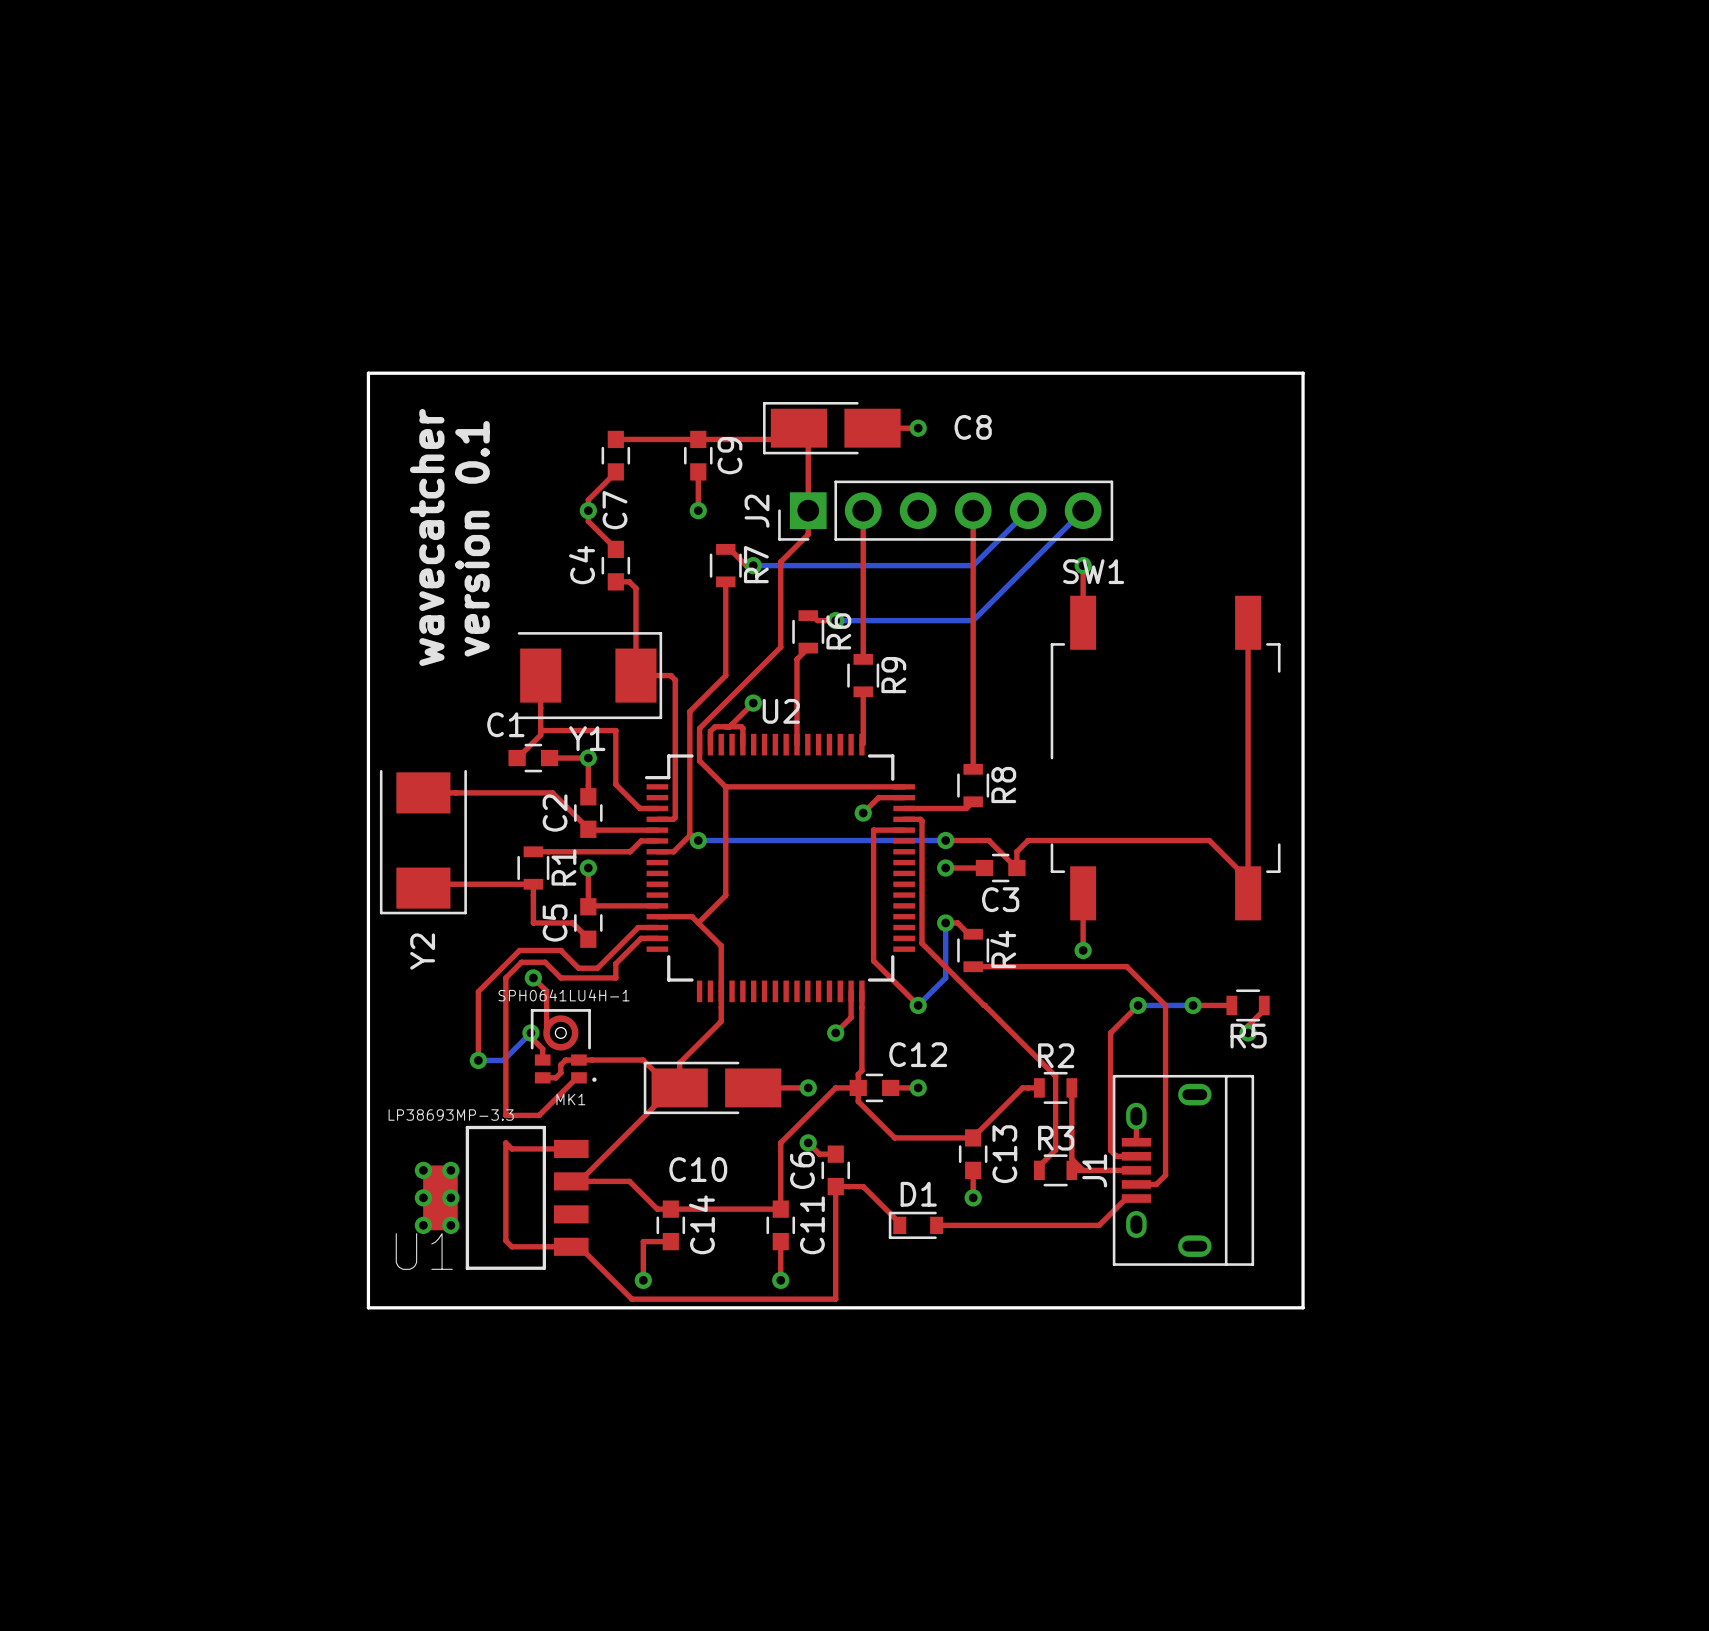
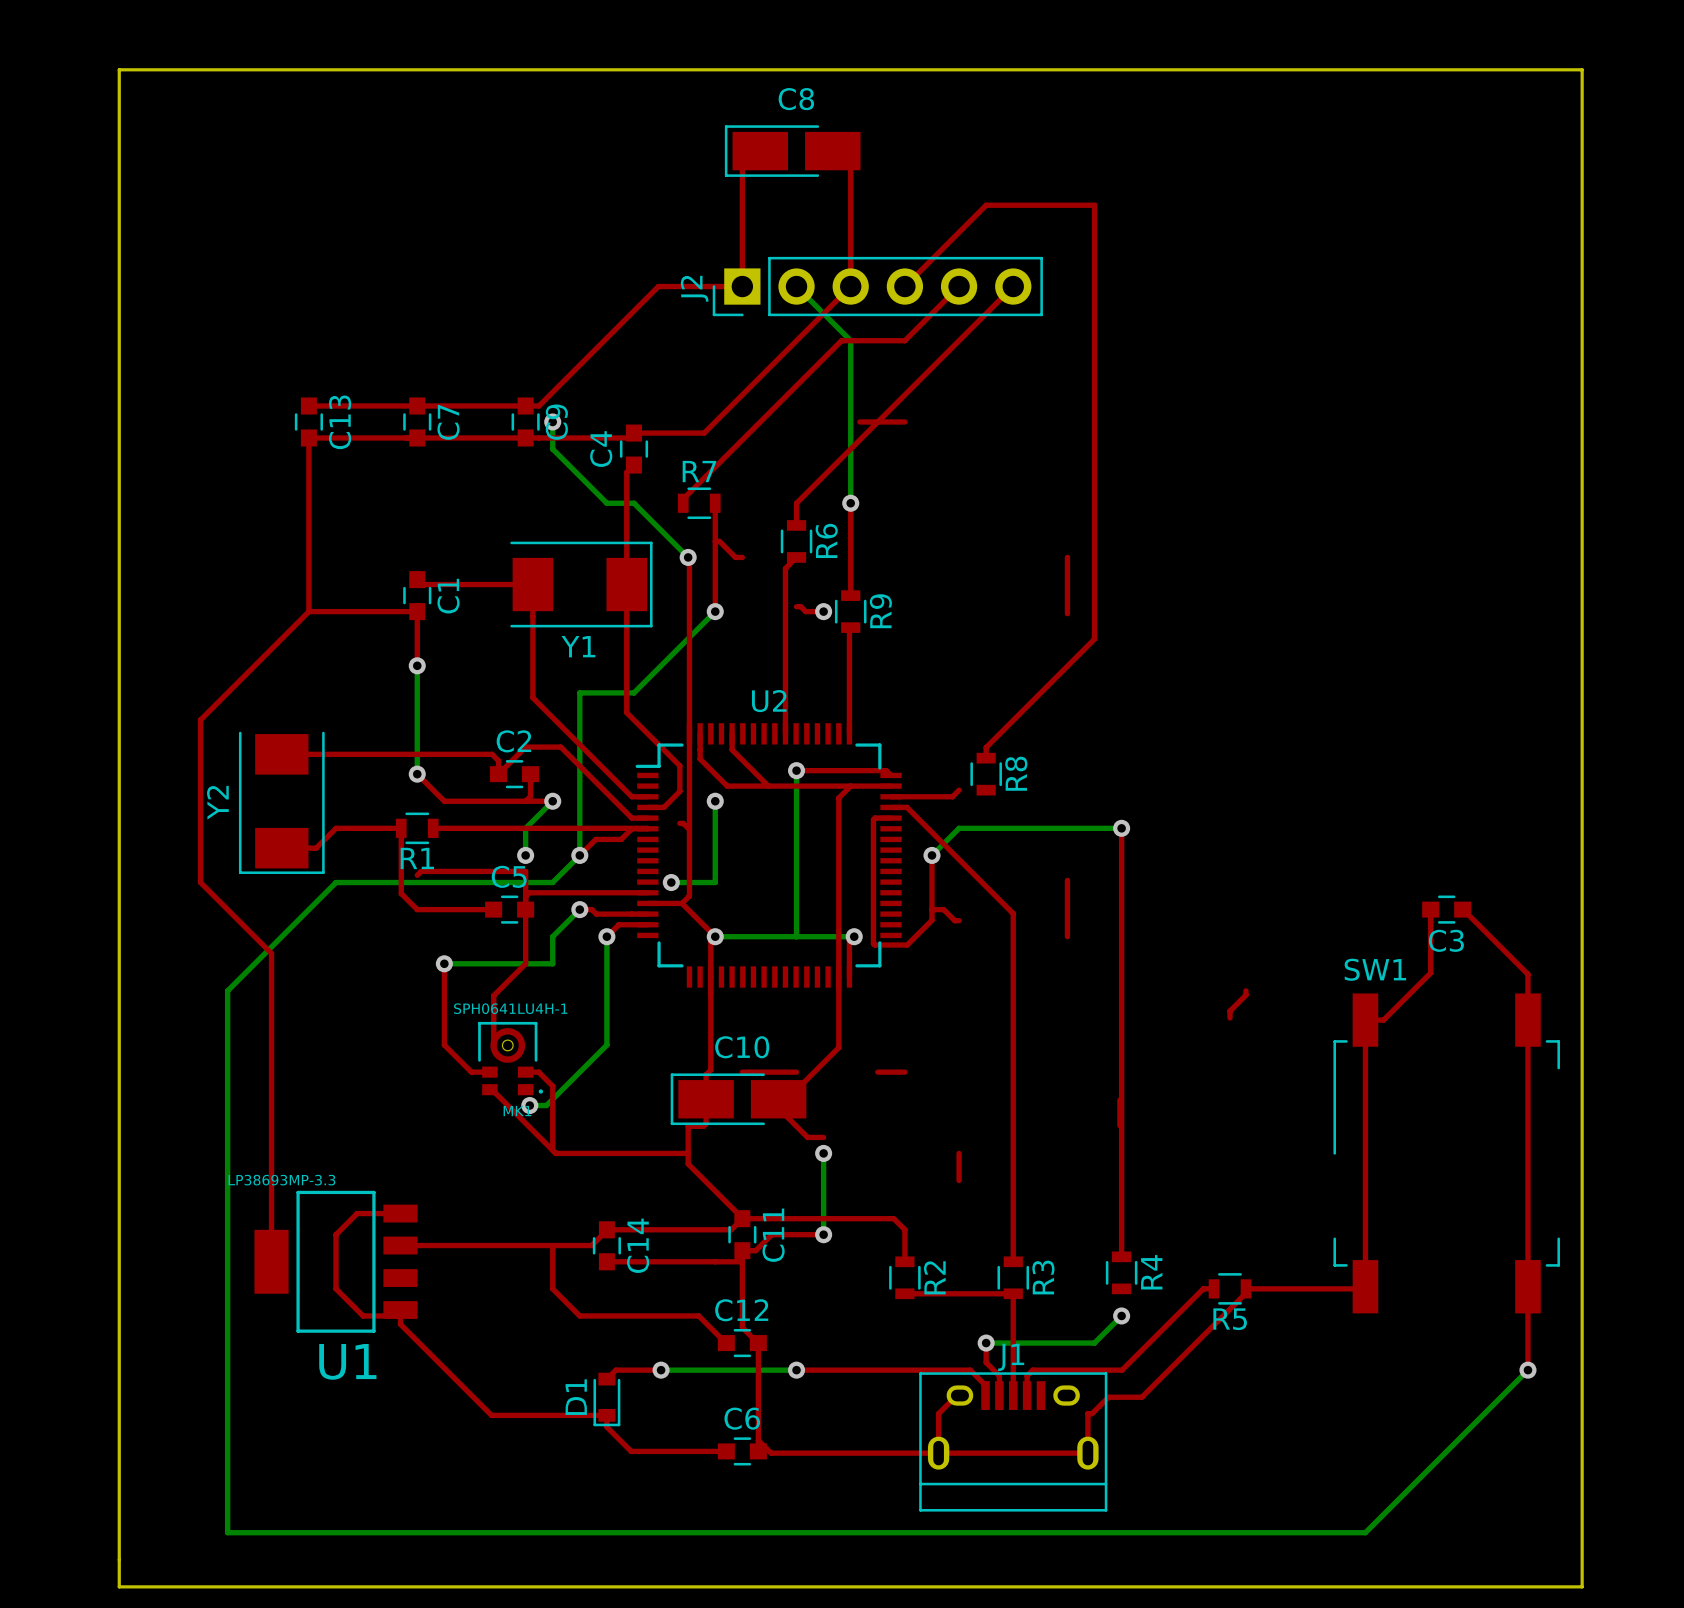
board edge: none -> (119, 69) (119, 1586) (1582, 1586) (1582, 69) (119, 69)
top track: none -> (760, 151) (742, 169) (742, 286) (658, 286) (538, 405) (308, 405)
top track: none -> (832, 151) (850, 169) (850, 286) (704, 433)
bottom track: none -> (796, 286) (850, 340) (850, 503)
top track: none -> (904, 286) (986, 205) (1094, 205) (1094, 639) (986, 747) (986, 758)
top track: none -> (959, 286) (904, 340) (841, 340) (683, 498) (683, 503)
board edge: (368, 373) (1303, 373) (1303, 1307) (368, 1307) (368, 373) -> none
C8 name position: C8 (973, 427) -> C8 (796, 99)
bottom track: none -> (552, 421) (552, 449) (606, 503) (633, 503) (688, 557)
via: none -> (552, 421)
C8 position: (831, 428) -> (792, 151)
via: (918, 428) -> none
top track: (615, 439) (643, 439) -> (308, 611) (308, 437) (629, 437) (633, 433)
top track: (714, 439) (787, 439) (798, 428) (808, 437) (808, 510) -> (1013, 286) (796, 503)
C7 position: (615, 455) -> (417, 421)
C9 position: (698, 455) -> (525, 421)
top track: (615, 471) (588, 499) (588, 521) (615, 549) -> none
top track: (698, 471) (698, 510) -> none
via: (588, 510) -> none
C7 name position: C7 (615, 510) -> C7 (448, 422)
via: (698, 510) -> none
top track: none -> (715, 503) (715, 573)
via: none -> (850, 503)
J2 position: (945, 510) -> (877, 286)
top track: (973, 510) (973, 769) -> none
bottom track: (1028, 510) (973, 565) (753, 565) -> none
bottom track: (1083, 510) (973, 620) (835, 620) -> none
top track: (808, 533) (780, 561) (780, 647) (699, 728) -> (688, 557) (689, 717)
text: wavecatcher (427, 537) -> none
text: version 0.1 (472, 538) -> none
R7 name position: R7 (756, 564) -> R7 (699, 471)
C4 position: (615, 565) -> (633, 449)
via: none -> (688, 557)
R7 rotation: 0° (725, 565) -> 90° clockwise (699, 503)
R7 position: (725, 565) -> (699, 503)
via: (753, 565) -> none
via: (1083, 565) -> none
top track: (615, 581) (629, 581) (635, 588) -> (633, 465) (626, 472) (626, 579)
top track: none -> (417, 579) (422, 584) (532, 584) (532, 665)
top track: (863, 604) (863, 659) -> none
top track: none -> (308, 611) (417, 611) (417, 665)
top track: none -> (308, 611) (200, 719) (200, 882) (271, 953) (271, 1261)
top track: (725, 620) (725, 675) (689, 711) (689, 777) -> none
bottom track: none -> (715, 611) (633, 692) (579, 692) (579, 855) (552, 882) (336, 882) (227, 990) (227, 1532) (1365, 1532) (1527, 1370)
via: none -> (715, 611)
top track: (1248, 622) (1248, 893) -> none
R6 position: (808, 631) -> (796, 541)
top track: (808, 648) (796, 659) -> (796, 557) (785, 568) (785, 649)
bottom track: none -> (417, 665) (417, 774)
via: none -> (417, 665)
Y1 position: (589, 675) -> (581, 584)
top track: (635, 675) (670, 675) (675, 680) (675, 817) -> (626, 665) (626, 712) (679, 765)
R9 position: (863, 675) -> (850, 611)
top track: (863, 691) (861, 744) -> (850, 627) (849, 733)
top track: (753, 703) (729, 726) -> none
via: (753, 703) -> none
top track: (540, 708) (540, 735) (517, 758) -> none
top track: (540, 730) (615, 730) (615, 784) (641, 808) -> (532, 697) (631, 796)
top track: (710, 744) (710, 731) (714, 726) (741, 726) (742, 744) -> (768, 786) (732, 749) (732, 733)
C1 rotation: 0° (533, 758) -> 90° clockwise (417, 595)
C1 position: (533, 758) -> (417, 595)
top track: none -> (541, 747) (525, 747) (498, 774) (498, 760) (492, 754) (281, 754)
top track: (569, 758) (588, 758) (588, 796) -> (560, 747) (631, 818)
via: (588, 758) -> none
SW1 position: (1165, 758) -> (1446, 1153)
top track: (699, 760) (725, 786) (904, 786) -> (796, 770) (886, 770) (891, 775)
top track: none -> (689, 749) (689, 895) (681, 903)
bottom track: none -> (796, 770) (796, 936)
via: none -> (796, 770)
top track: none -> (417, 774) (444, 801) (552, 801)
via: none -> (417, 774)
R8 position: (973, 785) -> (986, 774)
top track: (725, 786) (725, 895) (698, 922) -> none
top track: none -> (525, 779) (530, 774) (530, 796) (525, 801)
top track: (423, 792) (552, 792) (589, 830) (641, 830) -> none
top track: none -> (850, 786) (838, 798) (838, 977)
top track: (878, 797) (863, 813) -> (865, 786) (727, 786) (700, 759) (700, 733)
top track: (689, 803) (689, 835) (673, 851) (657, 851) -> (679, 791) (665, 805)
bottom track: none -> (552, 801) (525, 828) (525, 855)
via: none -> (552, 801)
C2 rotation: 0° (588, 813) -> 90° clockwise (514, 774)
C2 position: (588, 813) -> (514, 774)
bottom track: none -> (715, 801) (715, 882) (671, 882)
via: none -> (715, 801)
via: (863, 813) -> none
top track: (921, 820) (921, 943) (1055, 1076) (1055, 1149) (1039, 1166) (1039, 1170) -> (908, 809) (1013, 913) (1013, 1261)
top track: (887, 830) (873, 830) (873, 960) (918, 1005) -> none
top track: none -> (433, 828) (647, 828)
bottom track: (698, 840) (945, 840) -> none
via: (698, 840) -> none
top track: (945, 840) (988, 840) (1016, 868) (1016, 851) (1028, 840) (1209, 840) (1248, 879) -> none
via: (945, 840) -> none
top track: none -> (1121, 828) (1121, 1256)
bottom track: none -> (1121, 828) (959, 828) (931, 855)
via: none -> (1121, 828)
Y2 position: (423, 842) -> (281, 802)
top track: (533, 851) (604, 851) -> none
top track: none -> (281, 848) (316, 848) (336, 828) (401, 828) (401, 893) (417, 909) (493, 909)
R1 rotation: 0° (533, 868) -> 90° clockwise (417, 828)
R1 position: (533, 868) -> (417, 828)
via: none -> (525, 855)
top track: (588, 868) (589, 905) -> (579, 855) (595, 839)
top track: (945, 868) (984, 868) -> (931, 855) (931, 920) (907, 945) (874, 945) (873, 819) (875, 818)
C3 position: (1000, 868) -> (1446, 909)
via: none -> (671, 882)
top track: none -> (580, 892) (529, 892) (525, 896)
top track: (533, 922) (572, 922) (588, 939) -> (525, 909) (525, 963) (493, 995) (493, 1045)
bottom track: none -> (579, 909) (552, 936) (552, 963) (444, 963)
C5 rotation: 0° (588, 922) -> 90° clockwise (509, 909)
C5 position: (588, 922) -> (509, 909)
via: none -> (579, 909)
bottom track: (945, 922) (945, 977) (918, 1005) -> none
via: (945, 922) -> none
top track: none -> (1430, 909) (1430, 972) (1383, 1020) (1365, 1020) (1365, 1286) (1363, 1288) (1245, 1288) (1245, 1293) (1141, 1397) (1108, 1397) (1092, 1413) (1087, 1413) (1087, 1453) (771, 1453) (758, 1440)
top track: none -> (1462, 909) (1527, 974) (1527, 1370)
top track: (638, 927) (597, 968) (578, 968) (560, 950) (519, 950) (478, 991) (478, 1060) -> (628, 914) (596, 914) (591, 909) (579, 909)
top track: (641, 938) (615, 963) (615, 977) (560, 977) (545, 962) (521, 962) (505, 977) (505, 1115) (539, 1115) (576, 1077) (578, 1077) -> (631, 924) (618, 924) (606, 936)
bottom track: none -> (606, 936) (606, 1045) (546, 1105) (529, 1105)
via: none -> (606, 936)
bottom track: none -> (715, 936) (854, 936)
via: none -> (715, 936)
via: none -> (854, 936)
R4 position: (973, 950) -> (1121, 1272)
via: (1083, 950) -> none
Y2 name position: Y2 (422, 951) -> Y2 (217, 802)
top track: (973, 966) (1126, 966) (1165, 1005) (1165, 1175) (1156, 1184) (1136, 1184) -> none
top track: none -> (444, 963) (444, 1045) (471, 1072) (489, 1072)
via: none -> (444, 963)
top track: (533, 977) (546, 991) (546, 1033) -> none
via: (533, 977) -> none
top track: (861, 991) (861, 1070) (858, 1074) (858, 1101) (894, 1137) (973, 1137) (1022, 1087) (1039, 1087) -> (849, 977) (849, 937) (854, 936)
via: (918, 1005) -> none
top track: (1138, 1005) (1110, 1032) (1110, 1150) (1116, 1156) (1136, 1156) -> none
bottom track: (1138, 1005) (1193, 1005) -> none
via: (1138, 1005) -> none
top track: (1193, 1005) (1231, 1005) -> none
via: (1193, 1005) -> none
R5 position: (1248, 1005) -> (1229, 1288)
top track: (851, 1017) (835, 1032) -> (838, 1002) (838, 1047) (787, 1099) (778, 1099) (778, 1108) (796, 1126)
top track: (721, 1021) (679, 1063) (679, 1087) (671, 1087) (643, 1060) (565, 1060) (560, 1064) (560, 1072) (555, 1077) (542, 1077) -> (710, 1006) (710, 1070) (706, 1074) (706, 1123) (703, 1126) (688, 1126) (688, 1163) (742, 1218)
top track: (530, 1032) (533, 1039) (542, 1048) (542, 1060) -> none
bottom track: (530, 1032) (503, 1060) (478, 1060) -> none
via: (530, 1032) -> none
via: (835, 1032) -> none
via: (1248, 1032) -> none
MK1 position: (563, 1046) -> (510, 1058)
C12 name position: C12 (918, 1054) -> C12 (741, 1310)
via: (478, 1060) -> none
top track: none -> (525, 1072) (538, 1072) (552, 1086) (552, 1150)
top track: (673, 1087) (579, 1181) -> none
C10 position: (712, 1087) -> (738, 1099)
via: (808, 1087) -> none
top track: (858, 1087) (835, 1087) (780, 1142) (780, 1209) (657, 1209) (629, 1181) (571, 1181) -> none
C12 position: (874, 1087) -> (742, 1343)
via: (918, 1087) -> none
R2 rotation: 0° (1055, 1087) -> 90° clockwise (904, 1277)
R2 position: (1055, 1087) -> (904, 1277)
top track: (1071, 1087) (1071, 1159) (1083, 1170) -> none
top track: none -> (489, 1089) (492, 1089) (555, 1153) (688, 1153)
via: none -> (529, 1105)
via position: (808, 1142) -> (823, 1153)
top track: (571, 1148) (511, 1148) (505, 1142) (505, 1240) (511, 1246) (579, 1246) (631, 1299) (835, 1299) (835, 1186) (863, 1186) (899, 1225) -> none
C13 position: (973, 1154) -> (308, 421)
C10 name position: C10 (698, 1169) -> C10 (742, 1047)
via: (423, 1170) -> none
via: (450, 1170) -> none
bottom track: none -> (823, 1153) (823, 1234)
C6 rotation: 0° (835, 1170) -> 90° clockwise (742, 1451)
C6 position: (835, 1170) -> (742, 1451)
R3 rotation: 0° (1055, 1170) -> 90° clockwise (1013, 1277)
R3 position: (1055, 1170) -> (1013, 1277)
top track: (1071, 1170) (1136, 1170) -> none
J1 rotation: 0° (1183, 1170) -> 90° clockwise (1013, 1441)
J1 position: (1183, 1170) -> (1013, 1441)
via: (423, 1197) -> none
via: (450, 1197) -> none
U1 position: (505, 1197) -> (336, 1261)
via: (973, 1197) -> none
top track: (1136, 1198) (1126, 1198) (1099, 1225) (936, 1225) -> none
via: (423, 1225) -> none
via: (450, 1225) -> none
C14 position: (670, 1225) -> (606, 1245)
C11 position: (780, 1225) -> (742, 1234)
D1 rotation: 0° (915, 1225) -> 90° counterclockwise (606, 1399)
D1 position: (915, 1225) -> (606, 1399)
top track: none -> (400, 1213) (357, 1213) (336, 1234) (336, 1288) (363, 1315) (386, 1315) (392, 1310) (400, 1310) (400, 1324) (491, 1415) (606, 1415) (606, 1427) (631, 1451) (726, 1451)
top track: none -> (742, 1218) (731, 1229) (606, 1229) (591, 1245) (400, 1245)
top track: none -> (742, 1218) (893, 1218) (904, 1229) (904, 1261)
top track: (670, 1241) (643, 1241) (643, 1280) -> none
top track: (780, 1241) (780, 1280) -> none
U1 name position: U1 (424, 1251) -> U1 (347, 1361)
top track: none -> (823, 1234) (771, 1234) (755, 1250) (742, 1250) (742, 1327) (758, 1343) (758, 1451)
via: none -> (823, 1234)
top track: none -> (552, 1245) (552, 1288) (579, 1315) (698, 1315) (726, 1343)
top track: none -> (606, 1261) (742, 1261)
via: (643, 1280) -> none
via: (780, 1280) -> none
top track: none -> (1213, 1288) (1203, 1288) (1122, 1370) (1032, 1370) (1027, 1375) (1027, 1395)
top track: none -> (904, 1293) (1013, 1293) (1013, 1395)
bottom track: none -> (1121, 1315) (1094, 1343) (986, 1343)
via: none -> (1121, 1315)
top track: none -> (986, 1343) (986, 1362) (999, 1375) (999, 1395)
via: none -> (986, 1343)
top track: none -> (661, 1370) (615, 1370) (606, 1379)
bottom track: none -> (661, 1370) (796, 1370)
via: none -> (661, 1370)
top track: none -> (796, 1370) (970, 1370) (985, 1385) (985, 1395)
via: none -> (796, 1370)
via: none -> (1527, 1370)
top track: none -> (959, 1395) (956, 1395) (938, 1413) (938, 1453)

